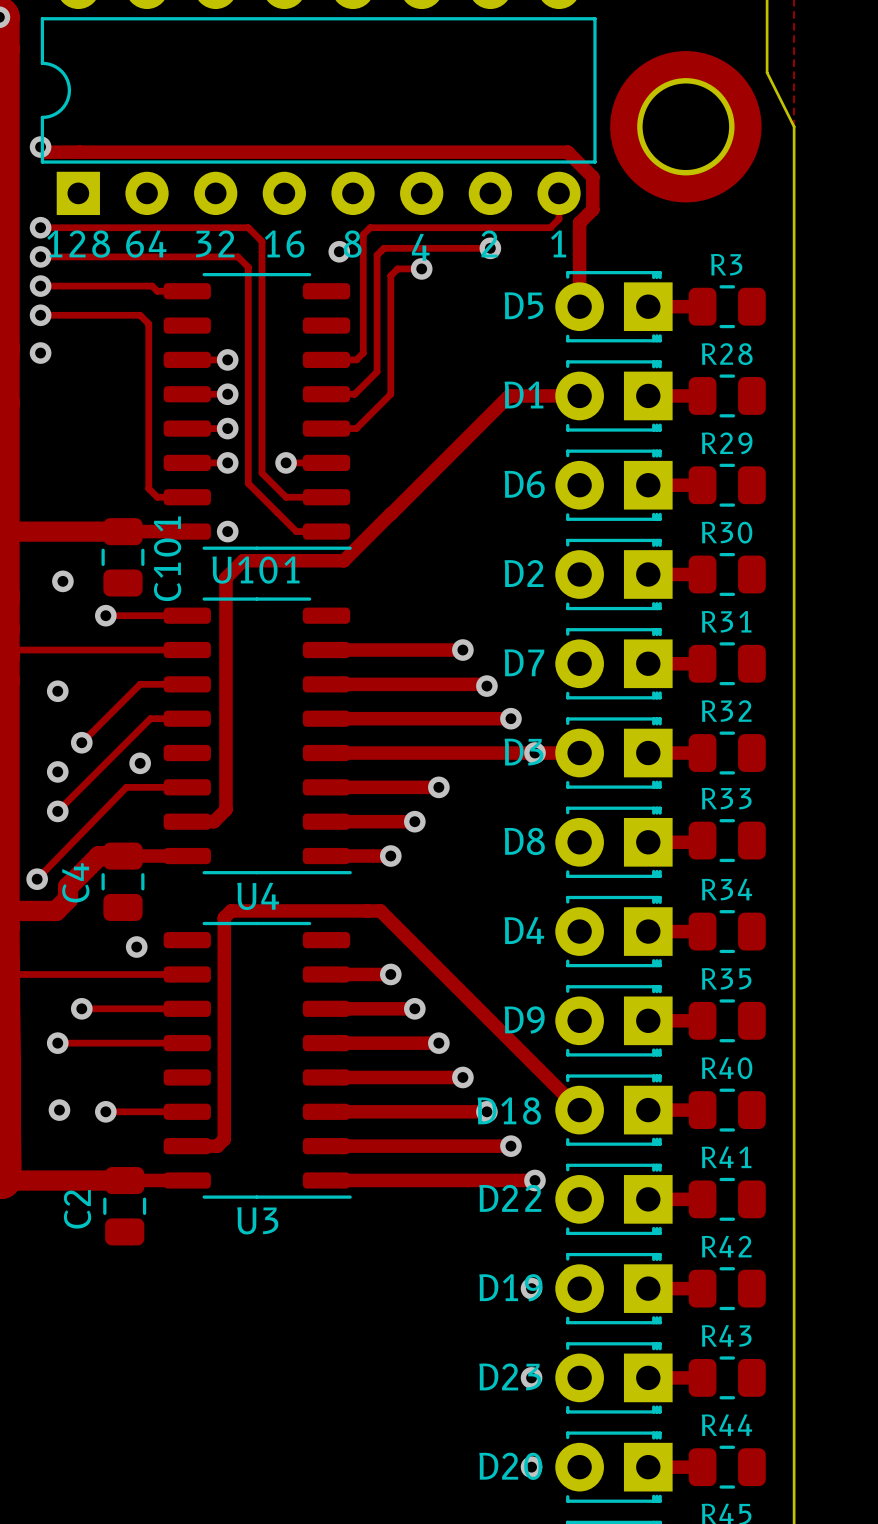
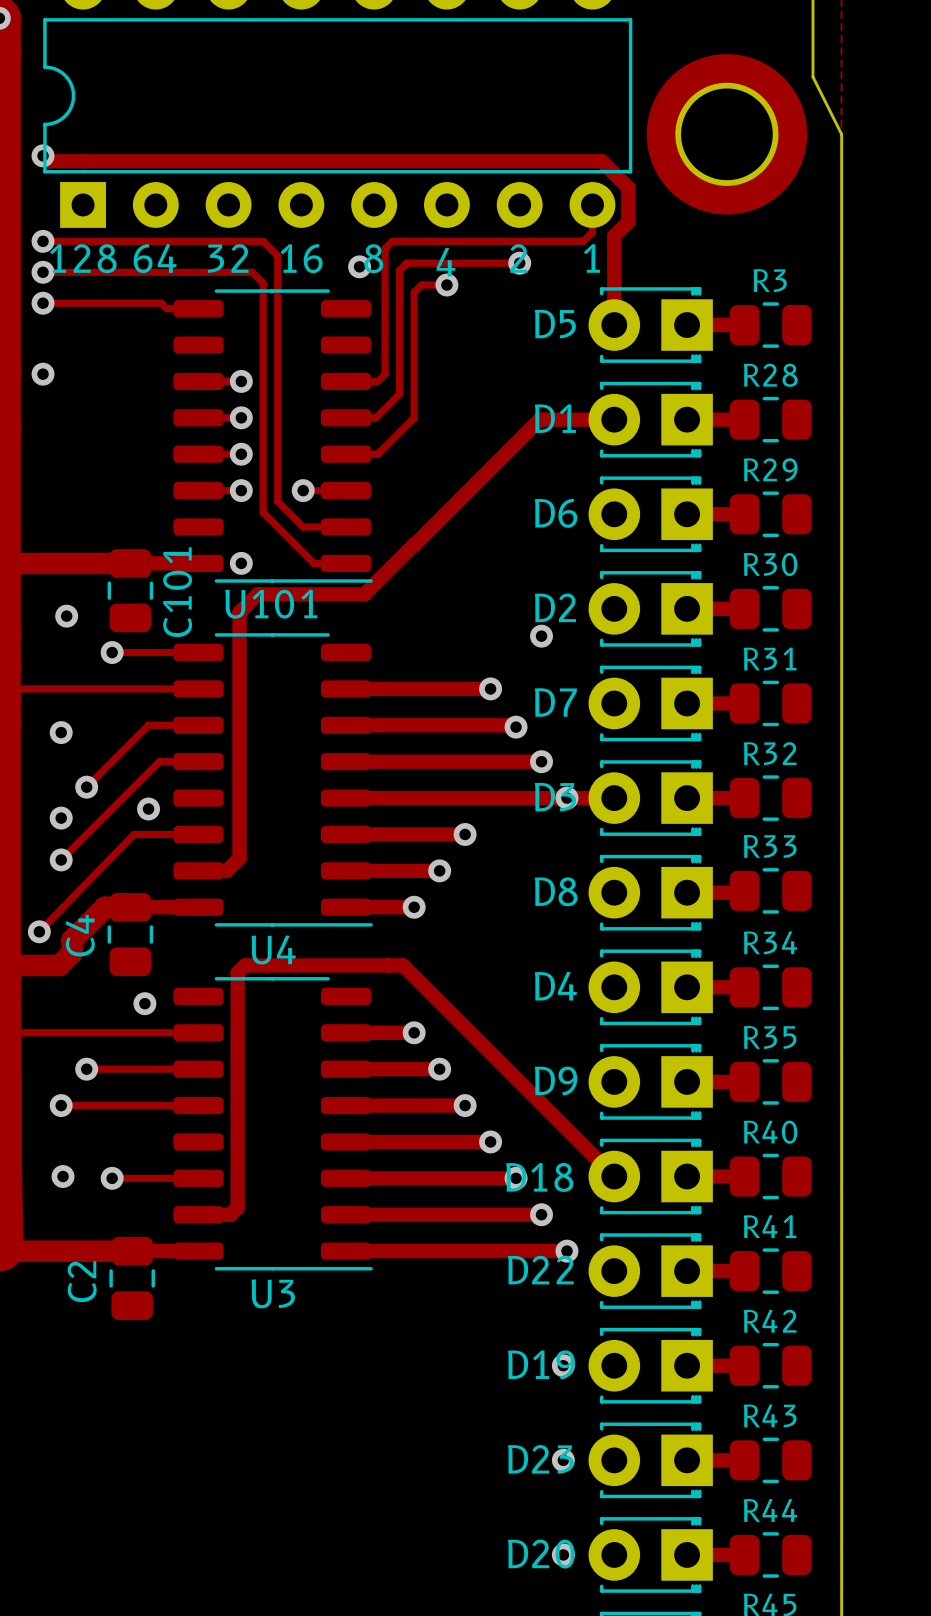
track: (40, 315) (140, 315) (148, 323) (148, 488) (157, 497) (187, 497) -> none
via: (40, 315) -> none
via: none -> (541, 636)

